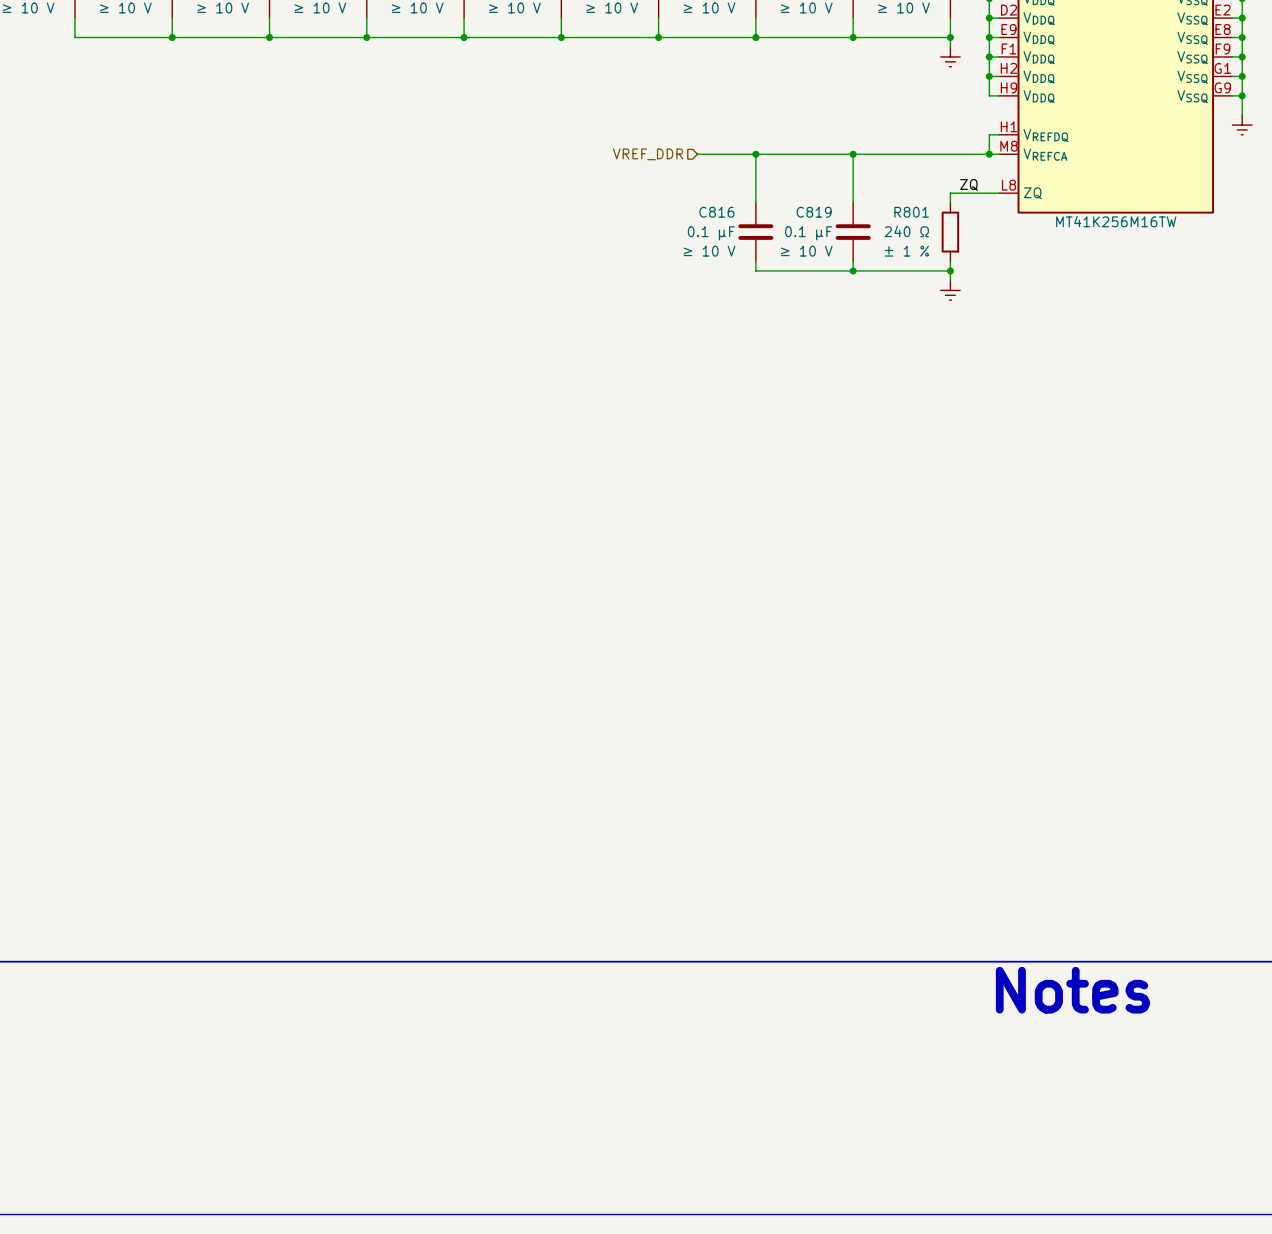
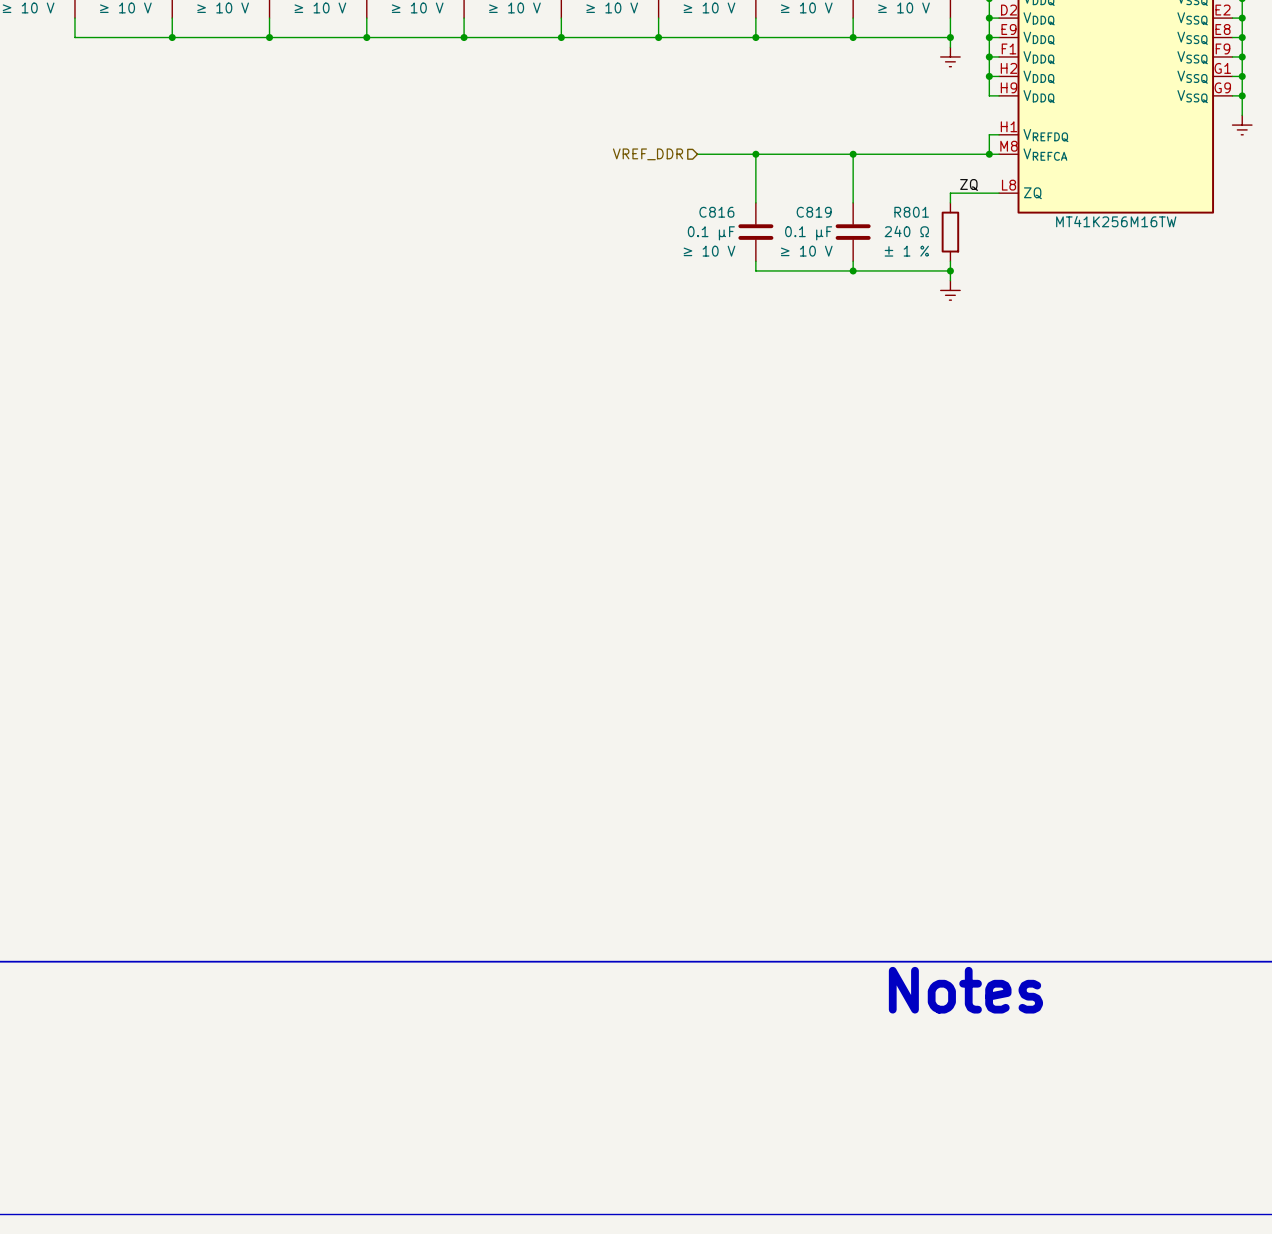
text position: Notes (1072, 990) -> Notes (965, 990)

